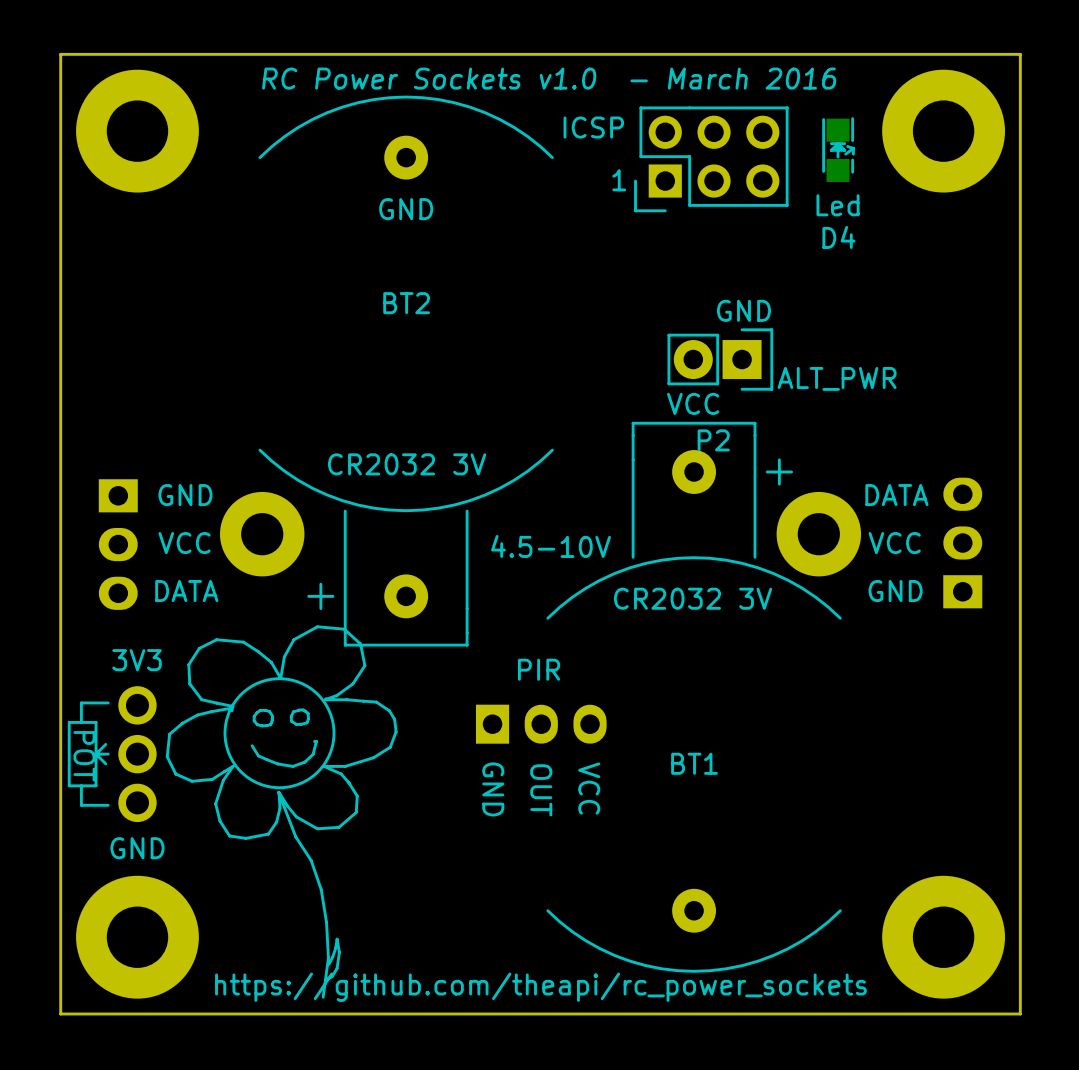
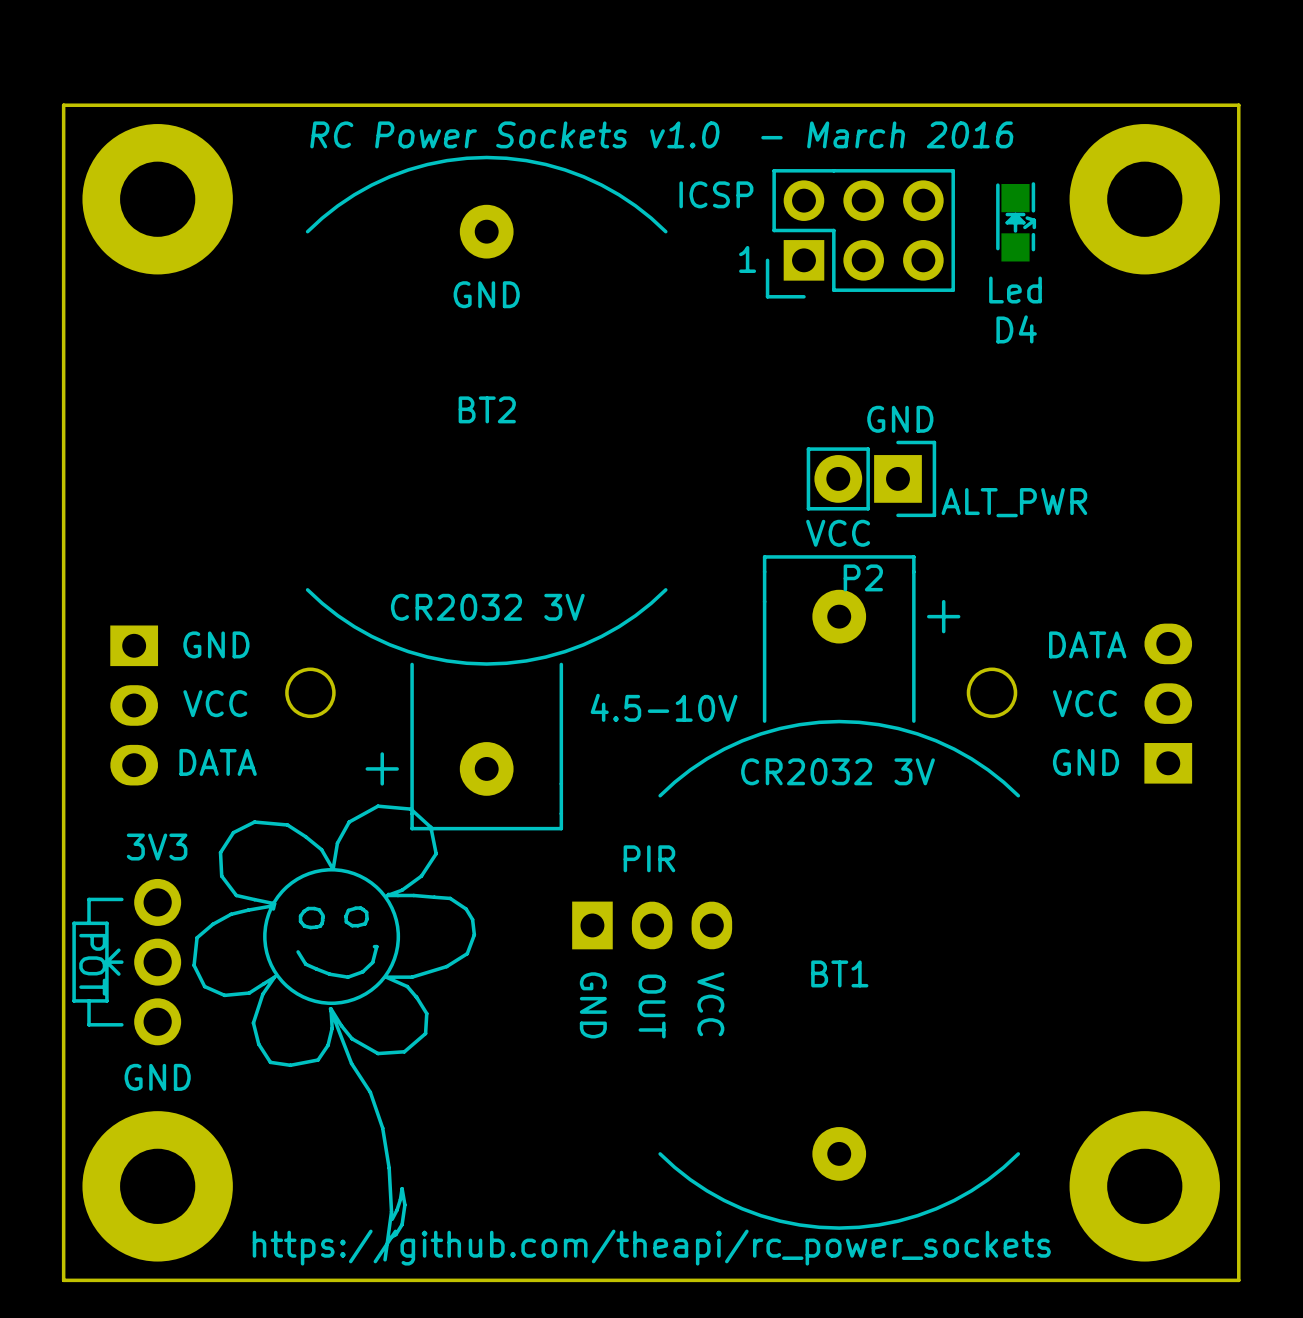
round board edge: none -> [285, 667, 336, 719]
round board edge: none -> [966, 667, 1018, 719]
part: (262, 534) -> none
part: (818, 534) -> none

